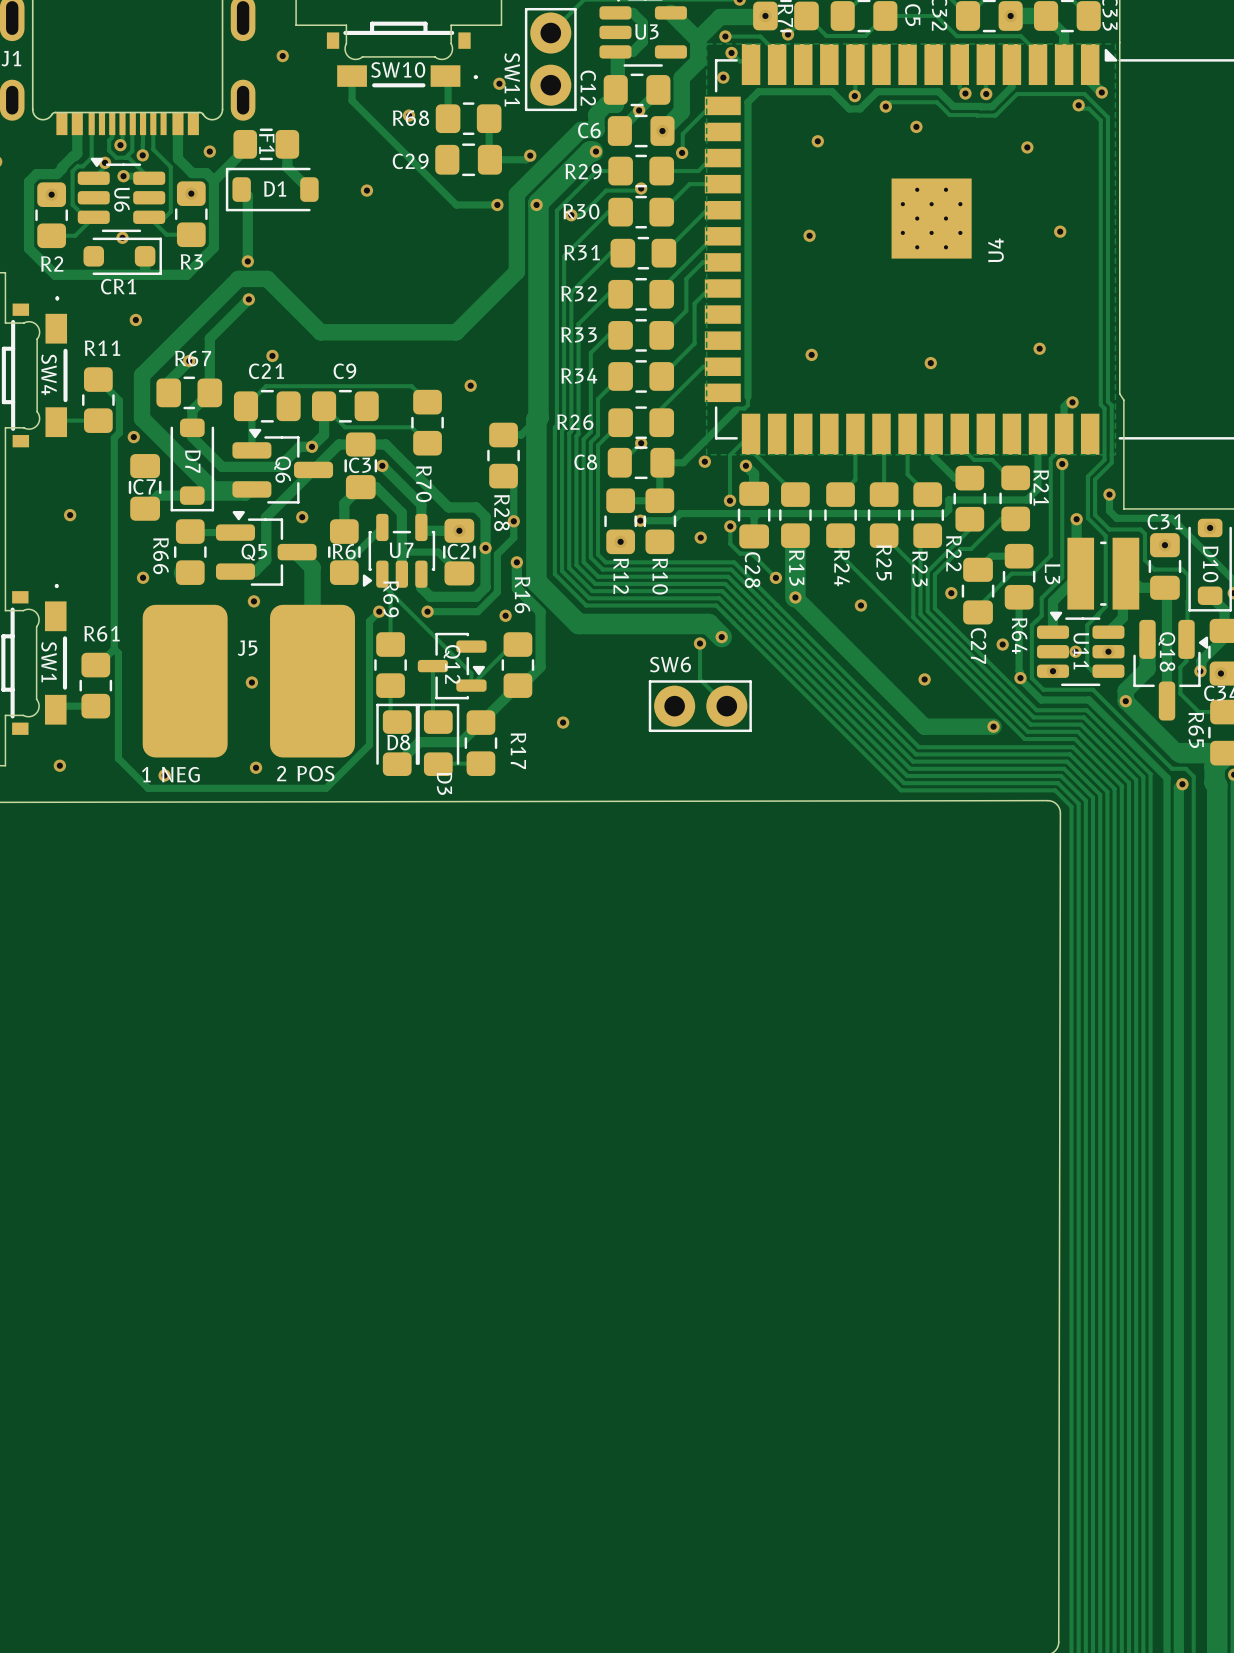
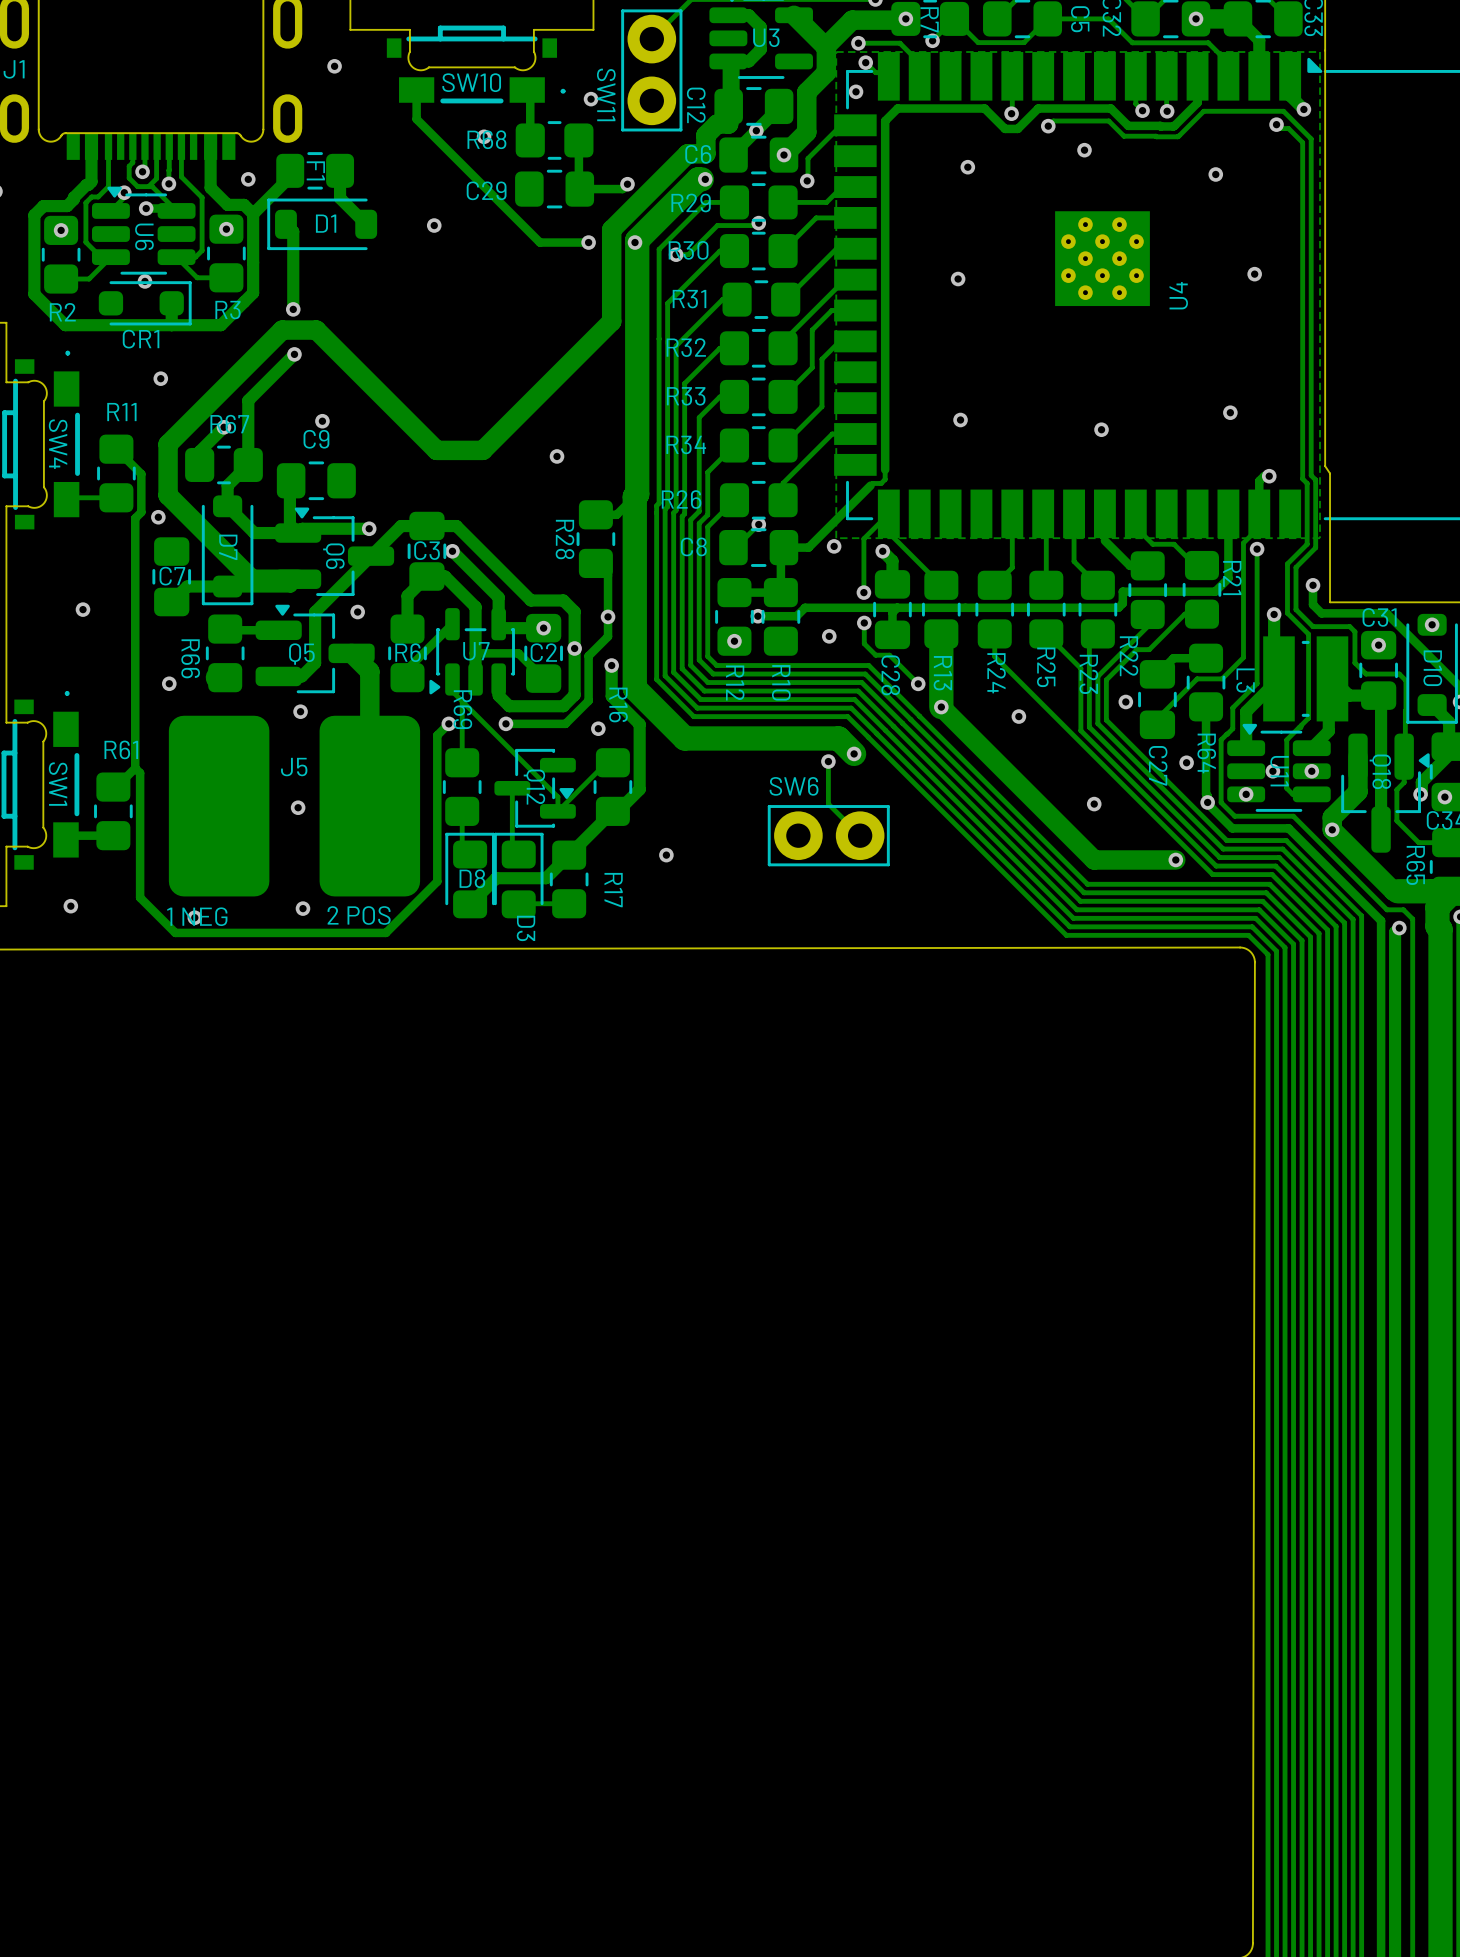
track: (456, 332) (320, 332) -> (539, 393) (482, 450) (436, 450) (379, 393)
C21 name: C21 (266, 371) -> C9 (316, 439)
track: (427, 402) (411, 386) (266, 386) (246, 406) (251, 412) (251, 450) -> (354, 528) (302, 528) (298, 533)
C9: (345, 406) -> none
track: none -> (289, 483) (289, 524) (298, 533)
R70: (427, 422) -> none
track: (192, 427) (192, 437) (222, 466) (279, 466) (299, 446) -> (227, 506) (254, 533) (298, 533)
track: (427, 443) (411, 427) (345, 427) (324, 406) (324, 434) (311, 446) -> none
R28 name position: R28 (501, 513) -> R28 (565, 539)

